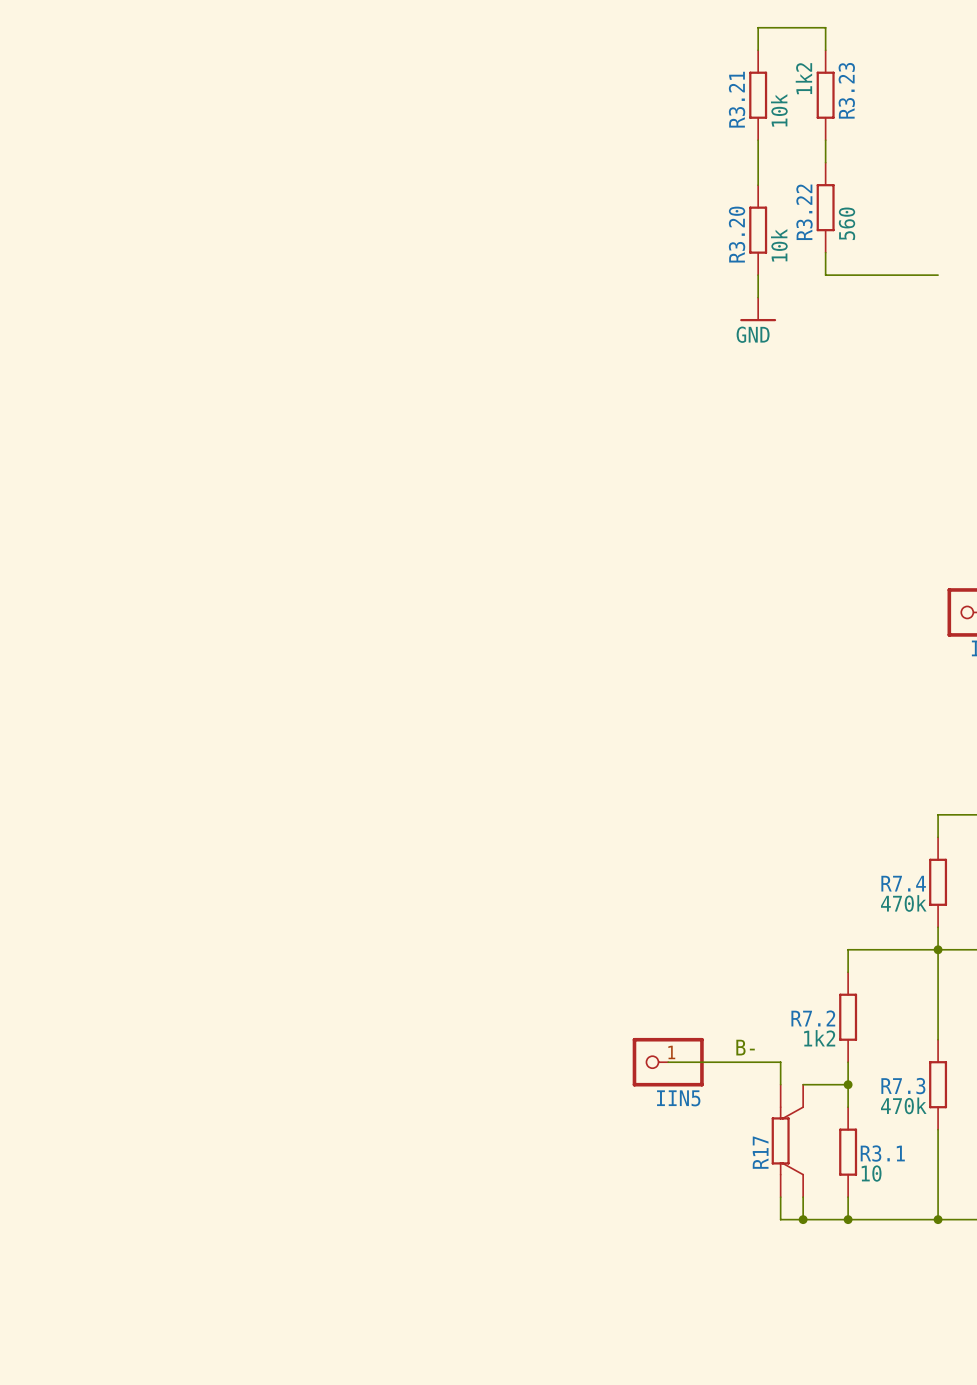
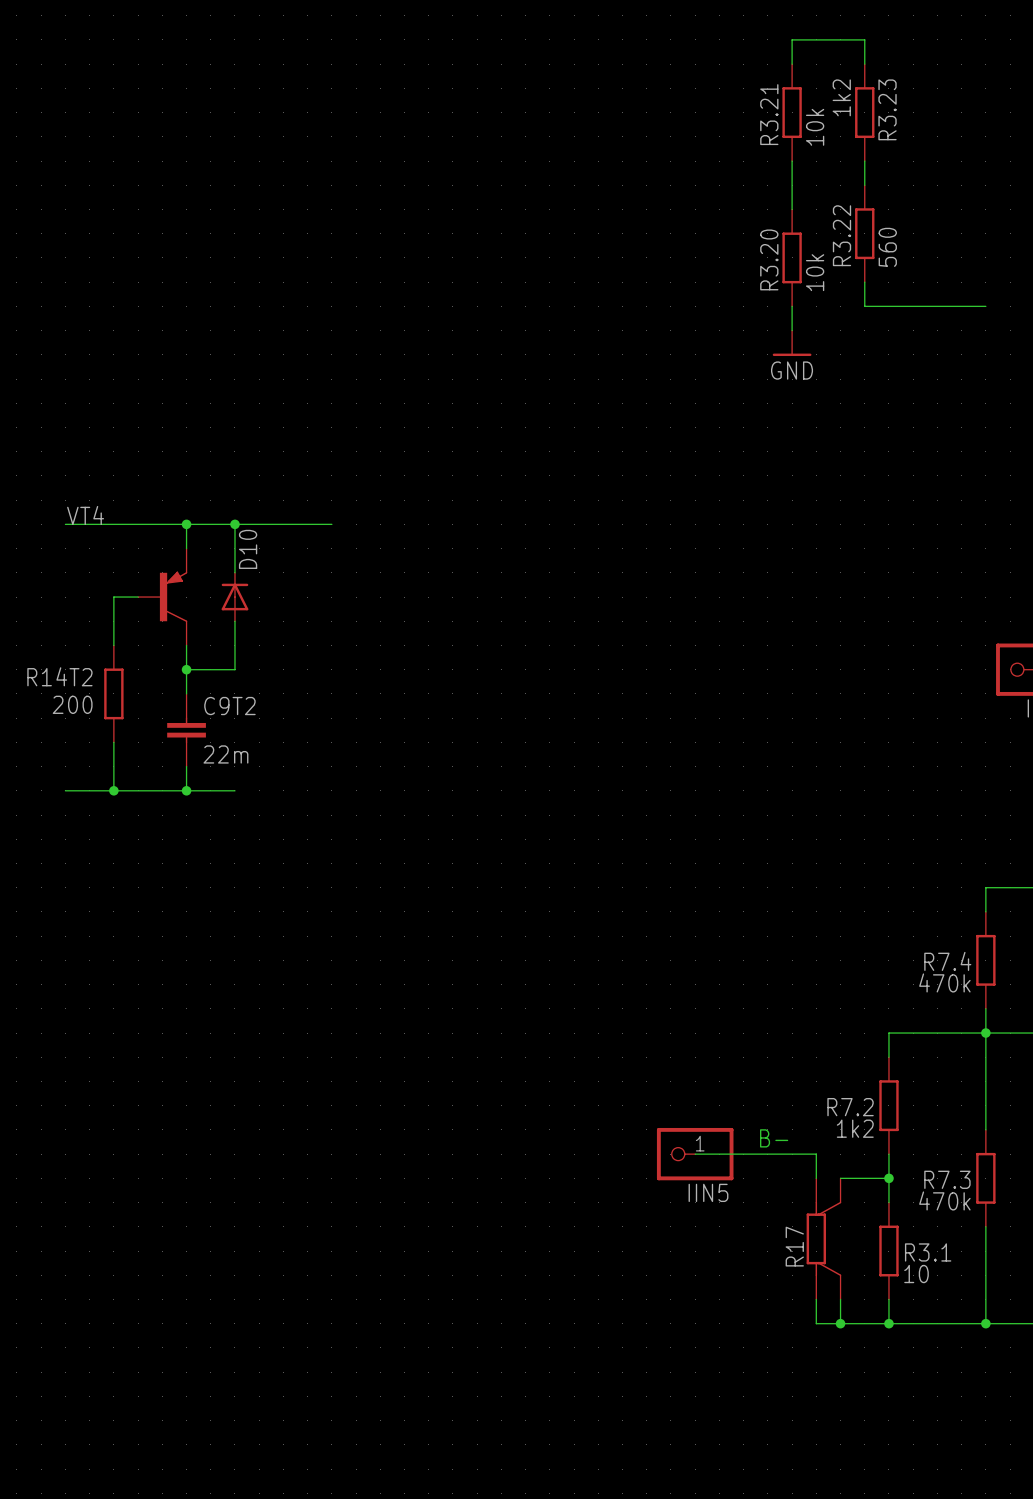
wire: none -> (65, 524) (331, 524)
wire: none -> (186, 524) (186, 548)
junction: none -> (186, 524)
wire: none -> (234, 524) (234, 572)
junction: none -> (234, 524)
wire: none -> (138, 597) (113, 597) (113, 645)
VT4: none -> (162, 597)
D10: none -> (234, 597)
wire: none -> (234, 621) (234, 669) (186, 669)
wire: none -> (186, 645) (186, 693)
junction: none -> (186, 669)
R14T2: none -> 200 (113, 693)
C9T2: none -> 22m (186, 730)
wire: none -> (113, 742) (113, 790)
wire: none -> (186, 766) (186, 790)
wire: none -> (65, 790) (234, 790)
junction: none -> (113, 790)
junction: none -> (186, 790)

